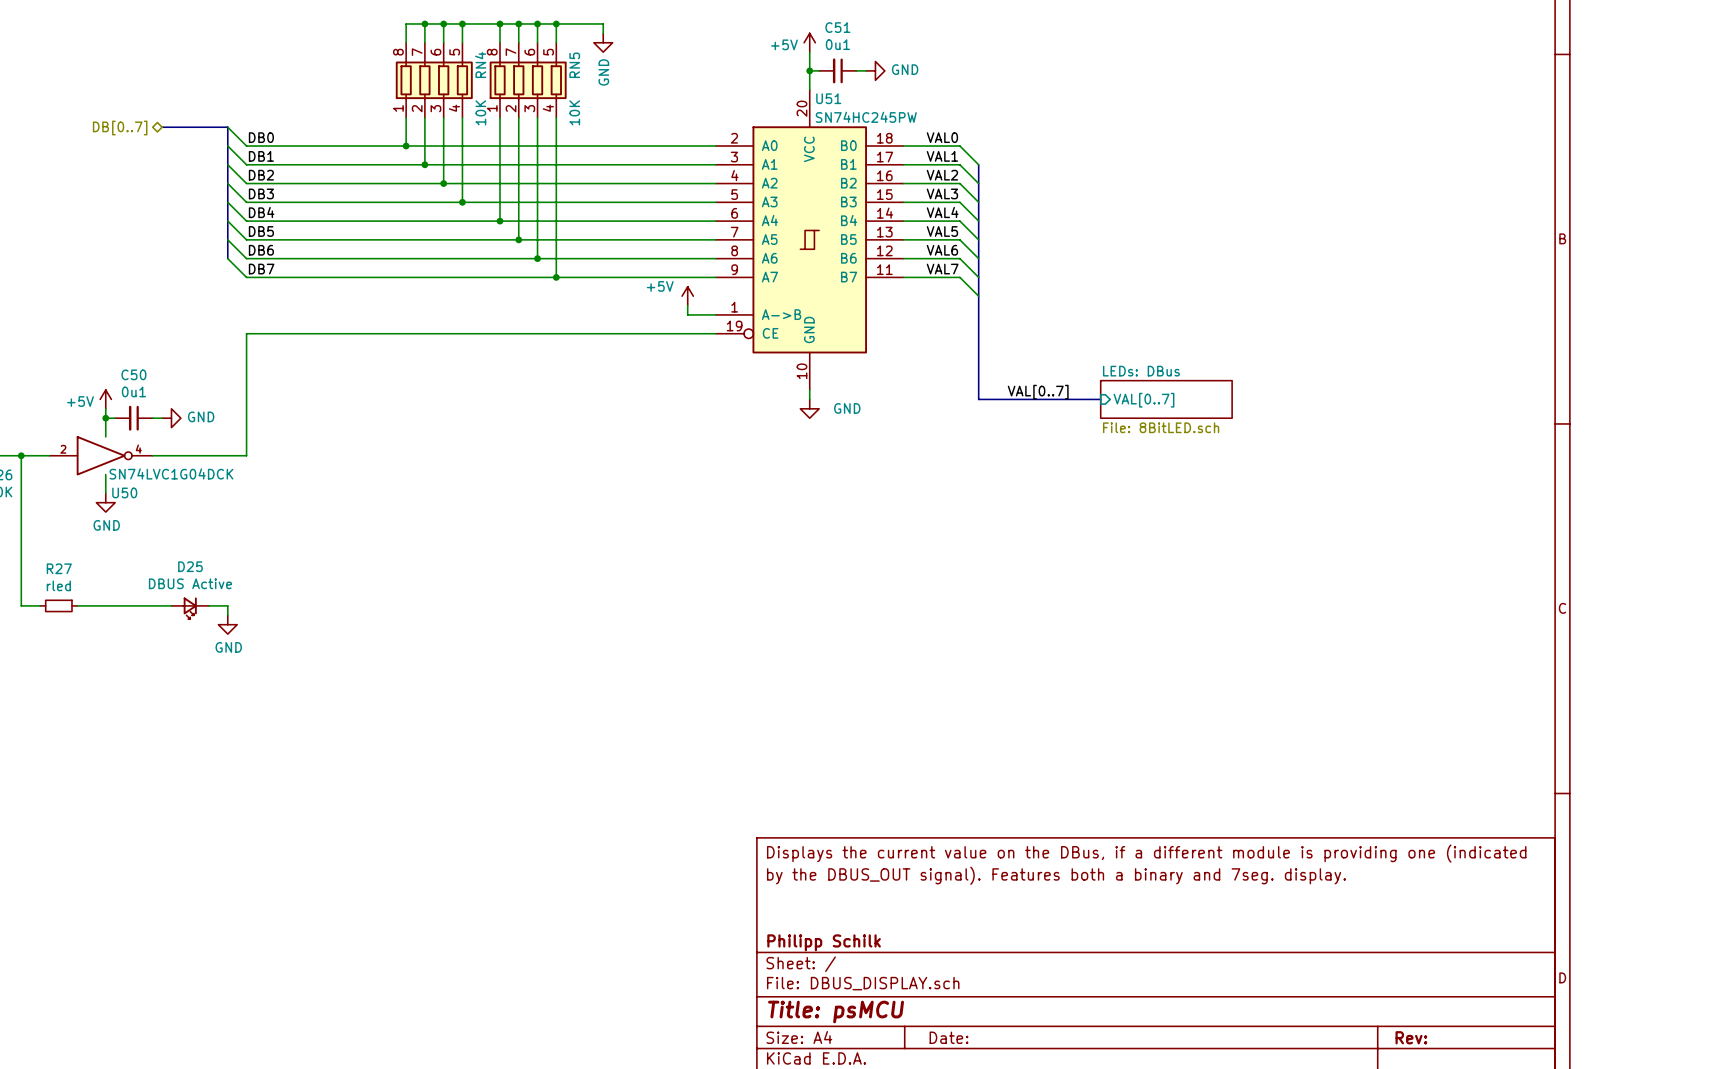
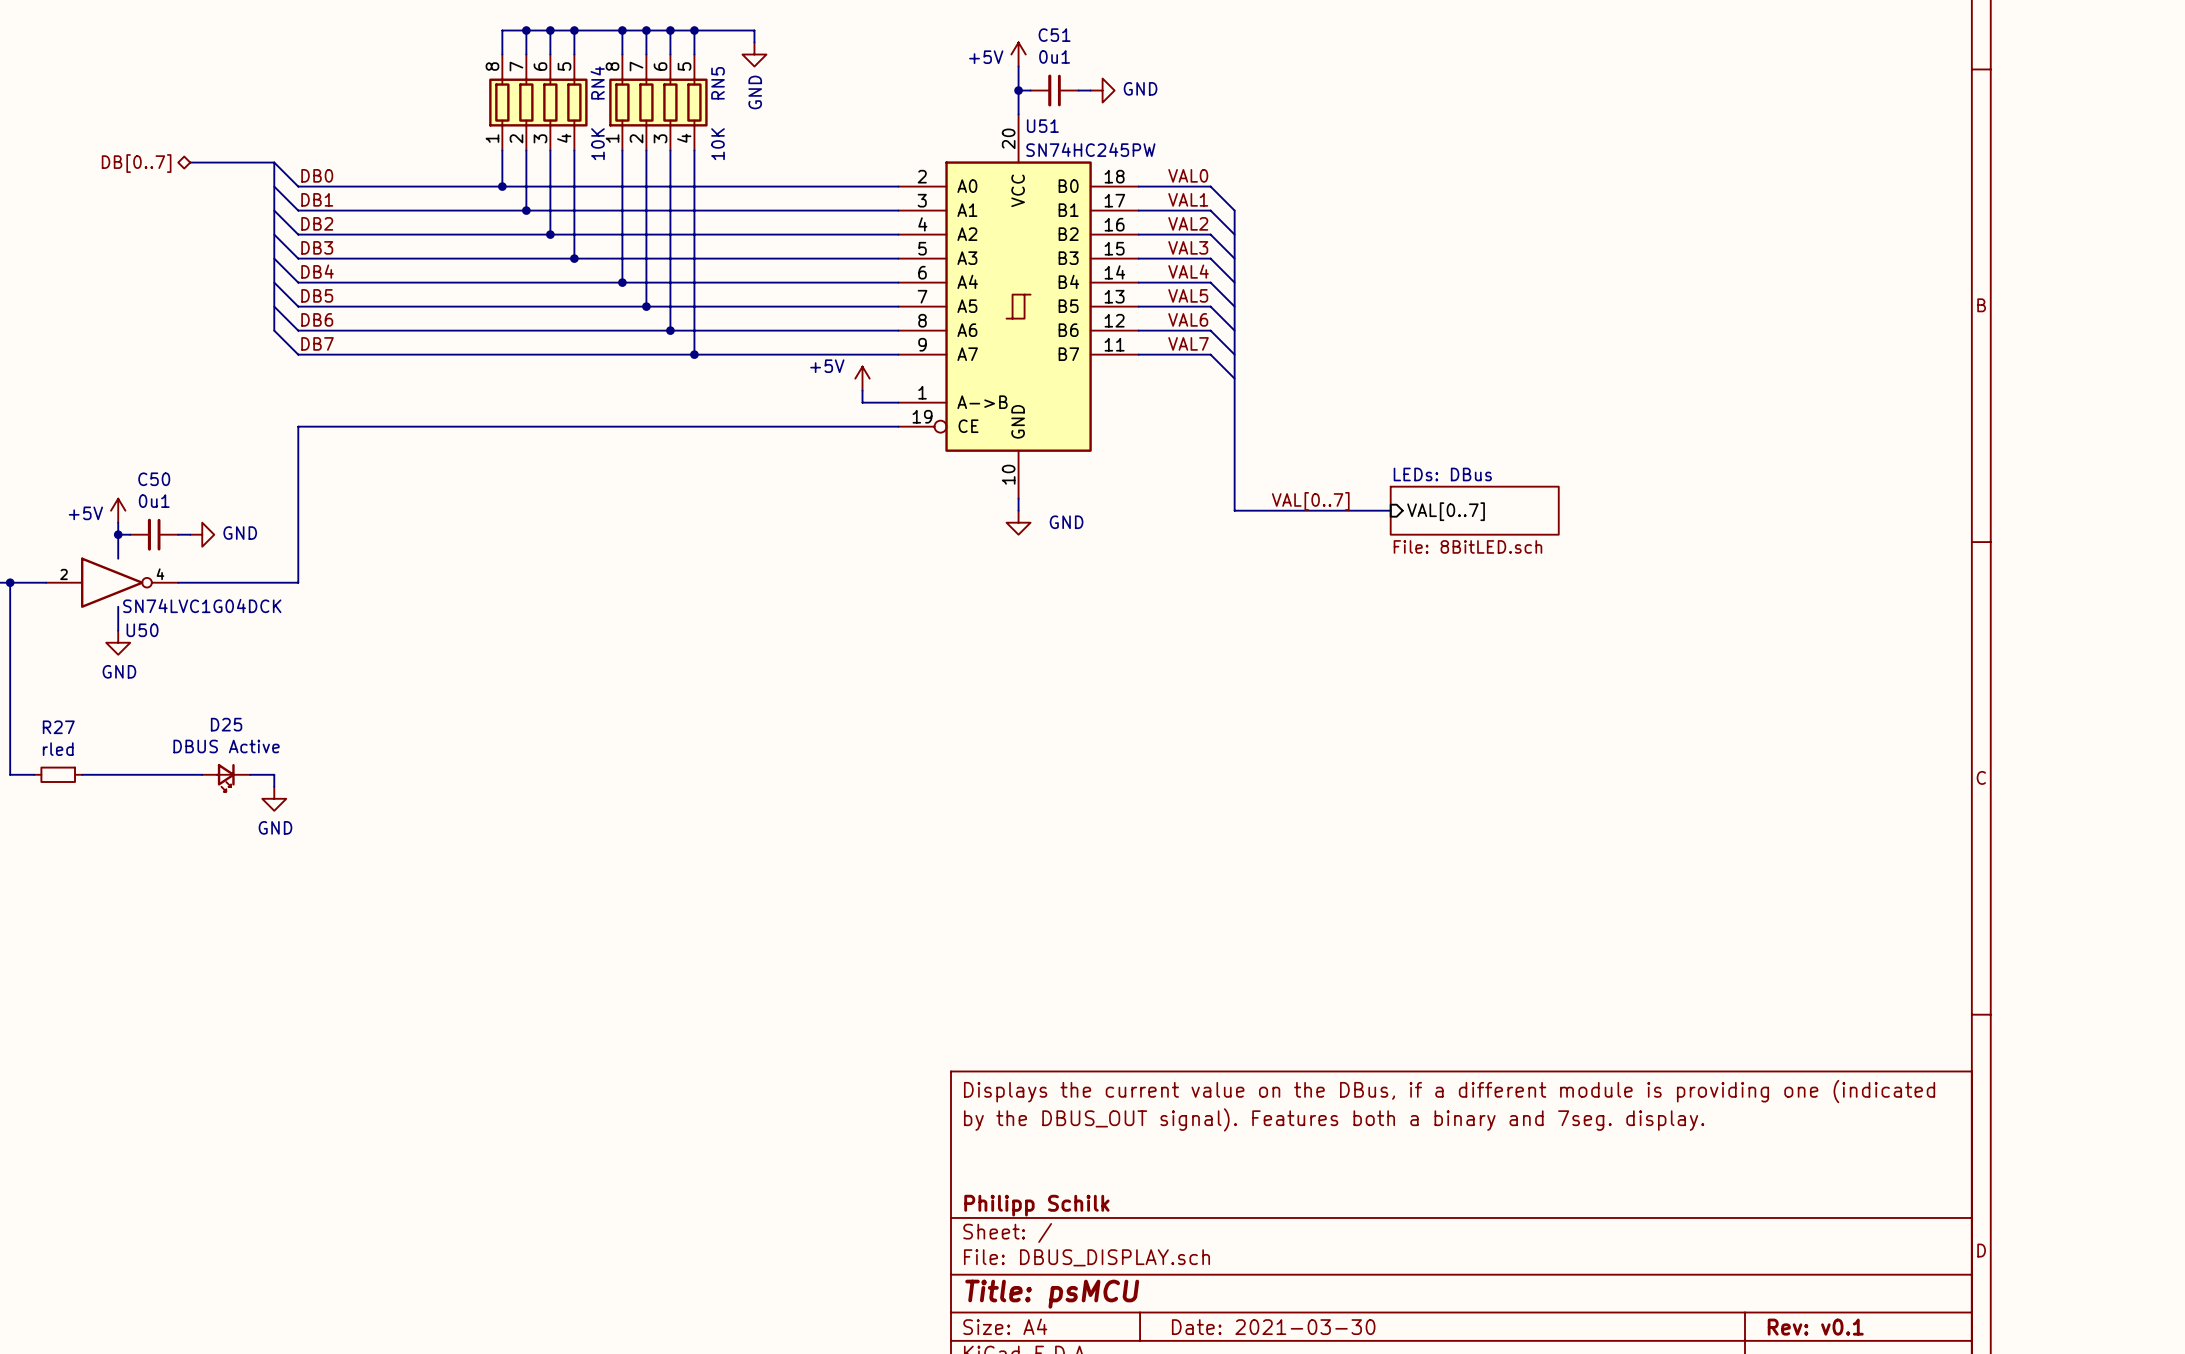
title block: Date: (949, 1037) -> Date: 2021-03-30 (1273, 1327)
title block: Rev: (1411, 1037) -> Rev: v0.1 (1815, 1327)

